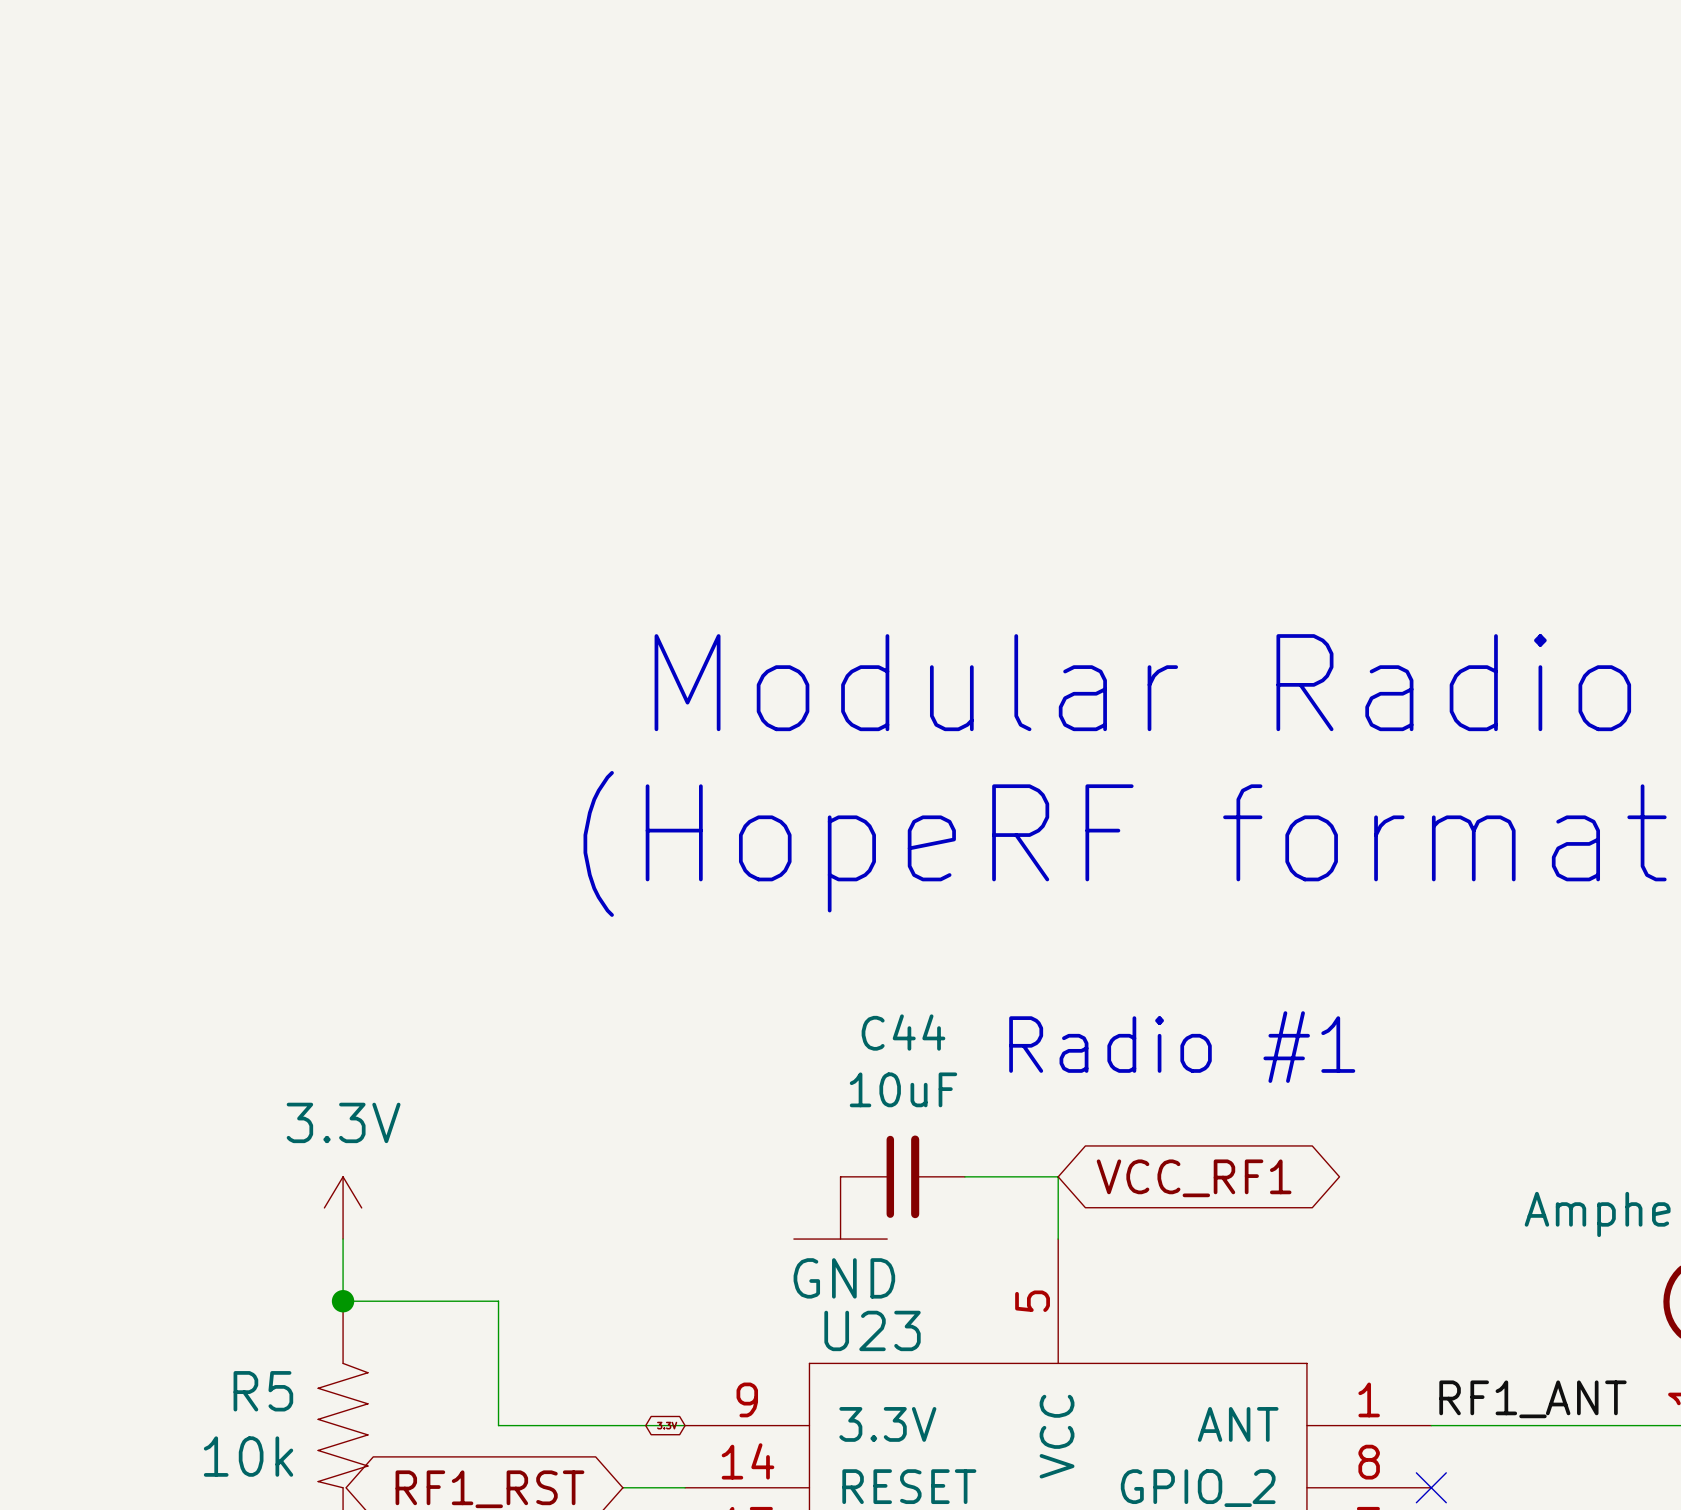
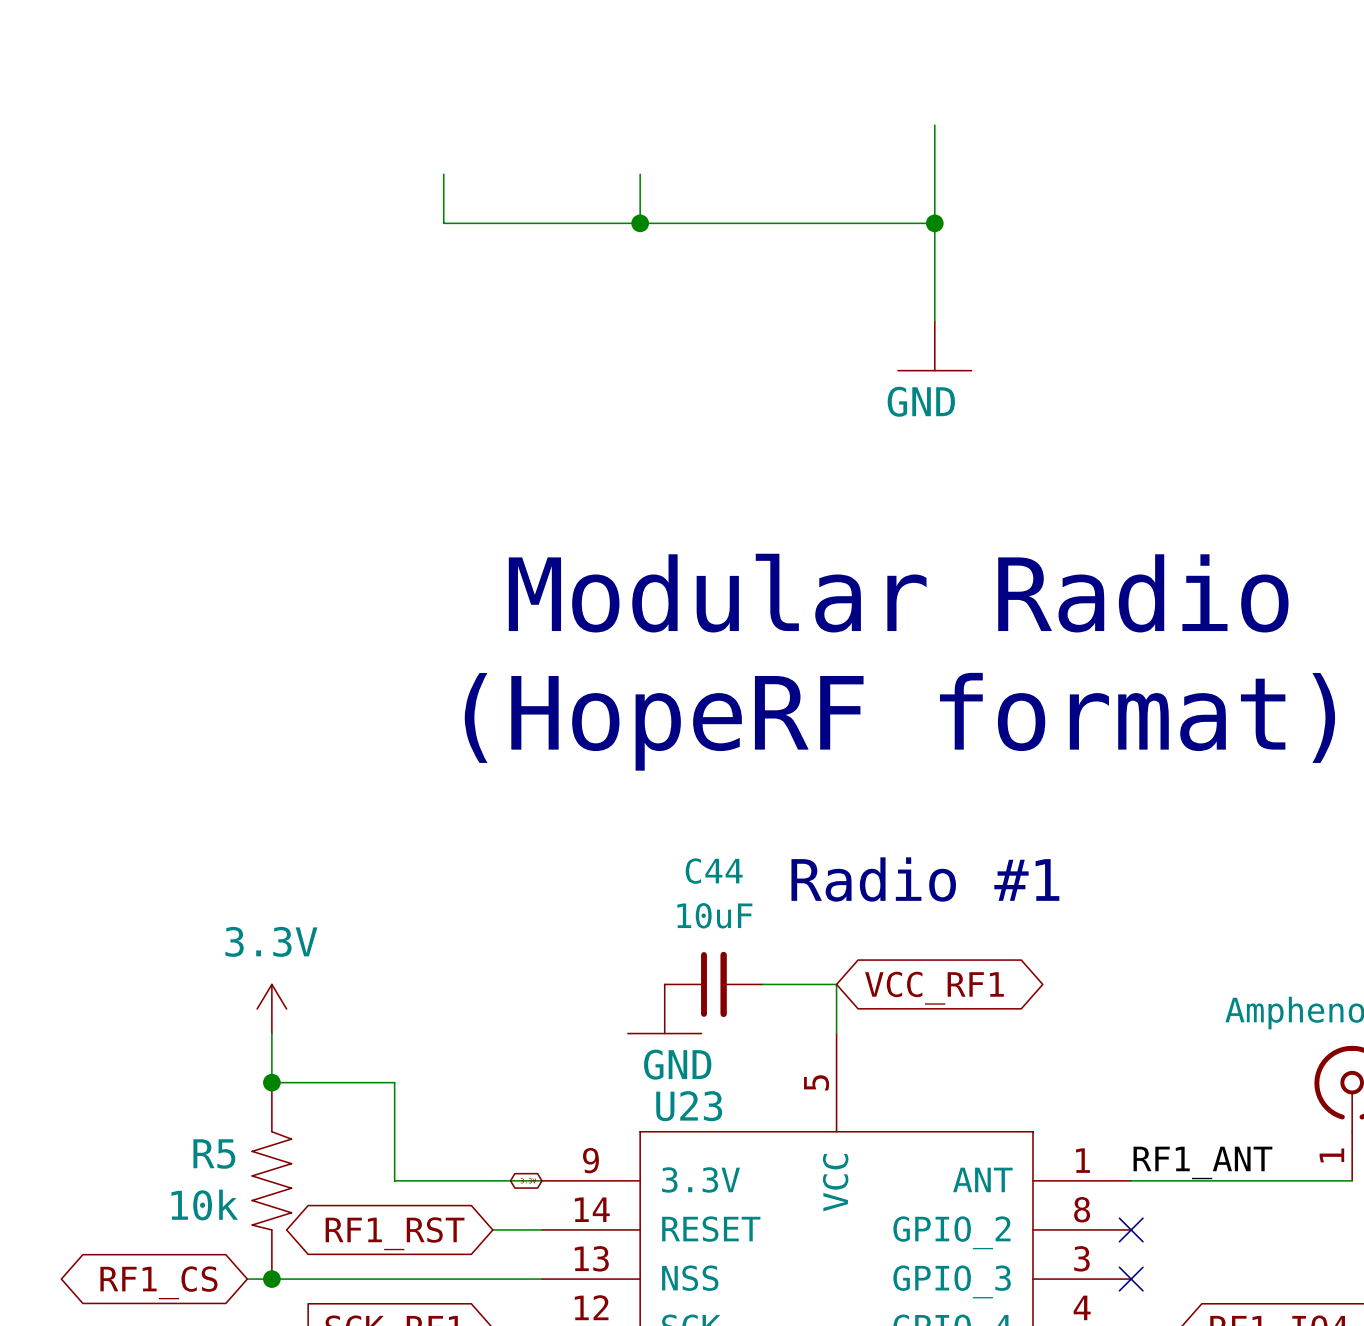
wire: none -> (934, 125) (934, 321)
wire: none -> (443, 174) (443, 223) (934, 223)
wire: none -> (640, 174) (640, 223)
junction: none -> (640, 223)
junction: none -> (934, 223)
power symbol: none -> GND (934, 346)

